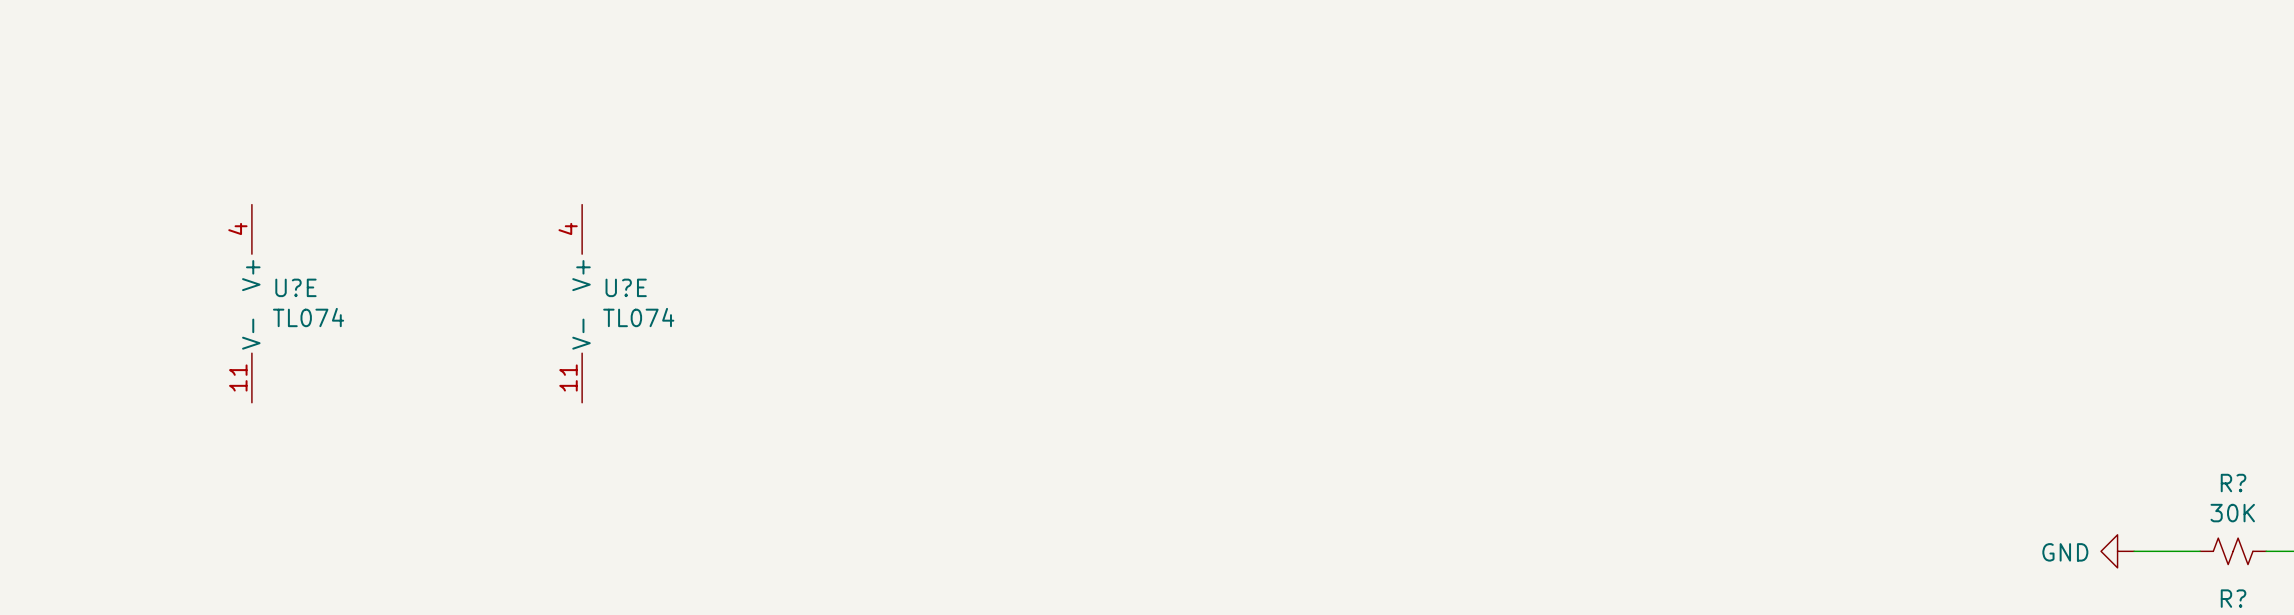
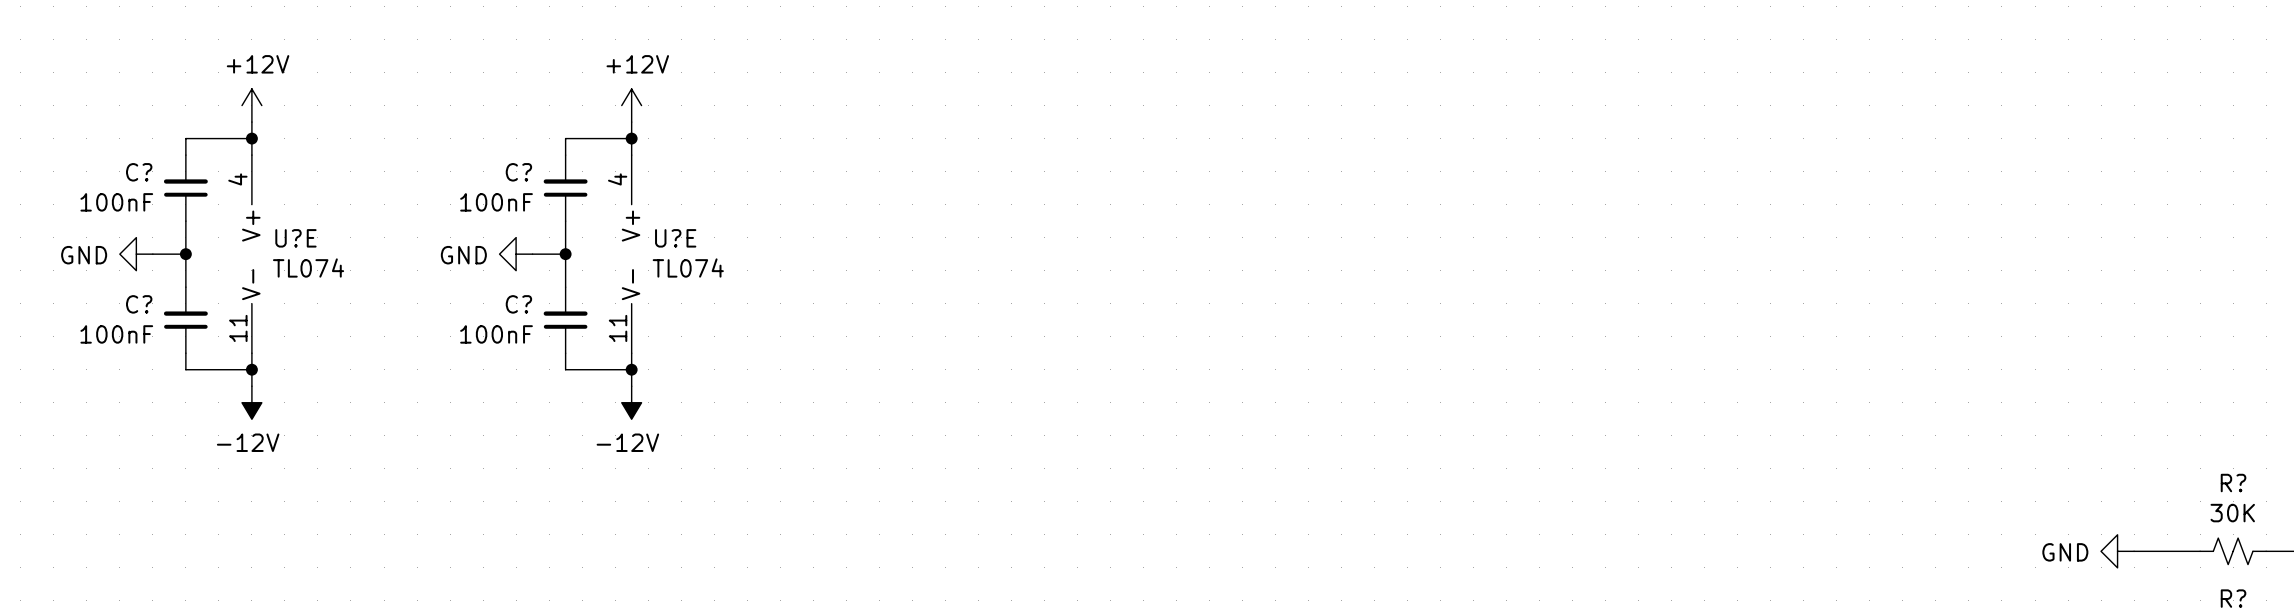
power symbol: none -> +12V (251, 105)
power symbol: none -> +12V (631, 105)
wire: none -> (251, 122) (251, 155)
wire: none -> (631, 122) (631, 155)
wire: none -> (251, 138) (185, 138) (185, 155)
junction: none -> (251, 138)
wire: none -> (631, 138) (565, 138) (565, 155)
junction: none -> (631, 138)
C?: none -> 100nF (185, 188)
C?: none -> 100nF (565, 188)
wire: none -> (185, 221) (185, 287)
wire: none -> (565, 221) (565, 287)
power symbol: none -> GND (136, 254)
wire: none -> (152, 254) (185, 254)
junction: none -> (185, 254)
power symbol: none -> GND (516, 254)
wire: none -> (532, 254) (565, 254)
junction: none -> (565, 254)
U?E position: (251, 303) -> (251, 254)
U?E position: (582, 303) -> (631, 254)
C?: none -> 100nF (185, 320)
C?: none -> 100nF (565, 320)
wire: none -> (185, 353) (185, 369) (251, 369)
wire: none -> (565, 353) (565, 369) (631, 369)
wire: none -> (631, 353) (631, 386)
junction: none -> (251, 369)
junction: none -> (631, 369)
power symbol: none -> -12V (251, 402)
power symbol: none -> -12V (631, 402)

